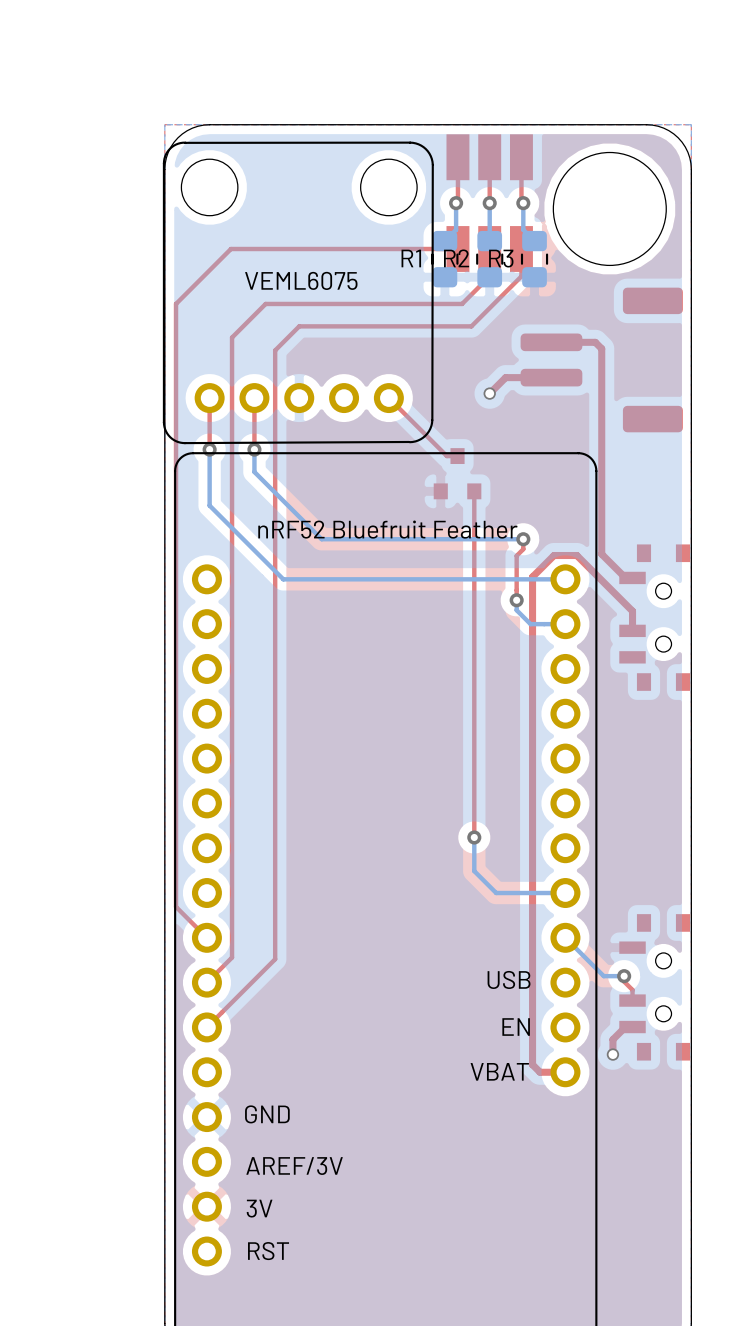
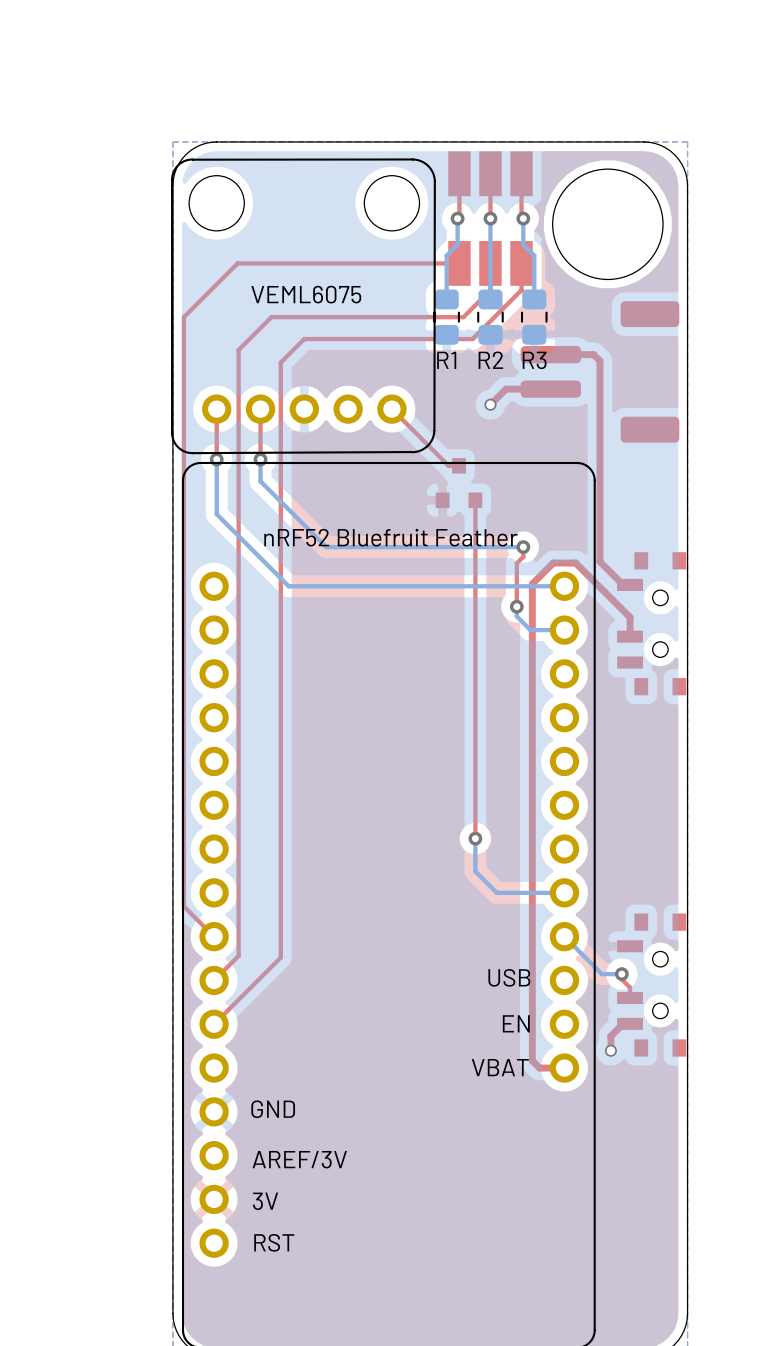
bottom track: none -> (446, 255) (446, 299)
bottom track: none -> (490, 255) (490, 299)
bottom track: none -> (534, 255) (534, 299)
R1 name position: R1 (411, 258) -> R1 (446, 360)
R2 name position: R2 (456, 258) -> R2 (490, 360)
R3 name position: R3 (501, 258) -> R3 (534, 360)
R1 position: (444, 259) -> (446, 317)
R2 position: (489, 259) -> (490, 317)
R3 position: (534, 259) -> (534, 317)

